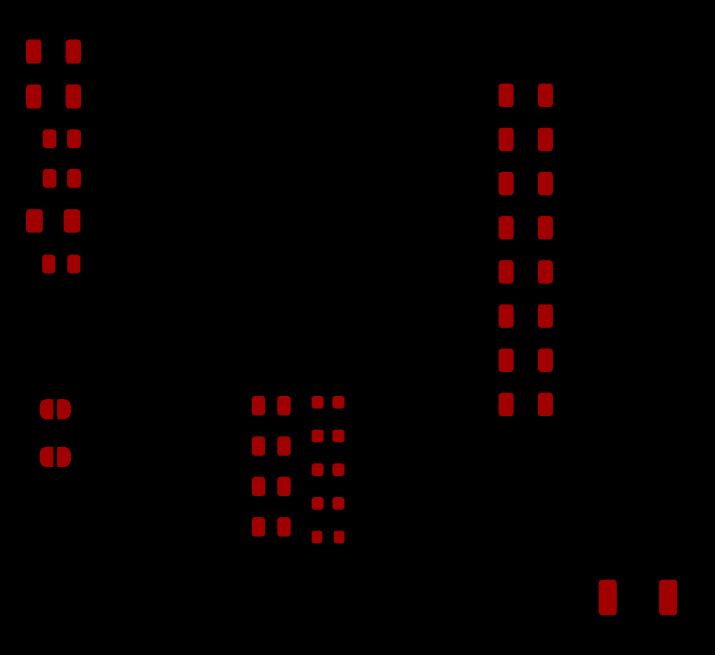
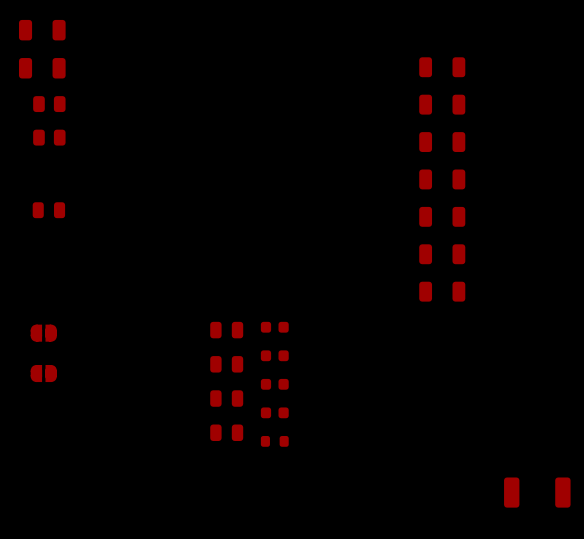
part: (53, 220) -> none
part: (525, 404) -> none

